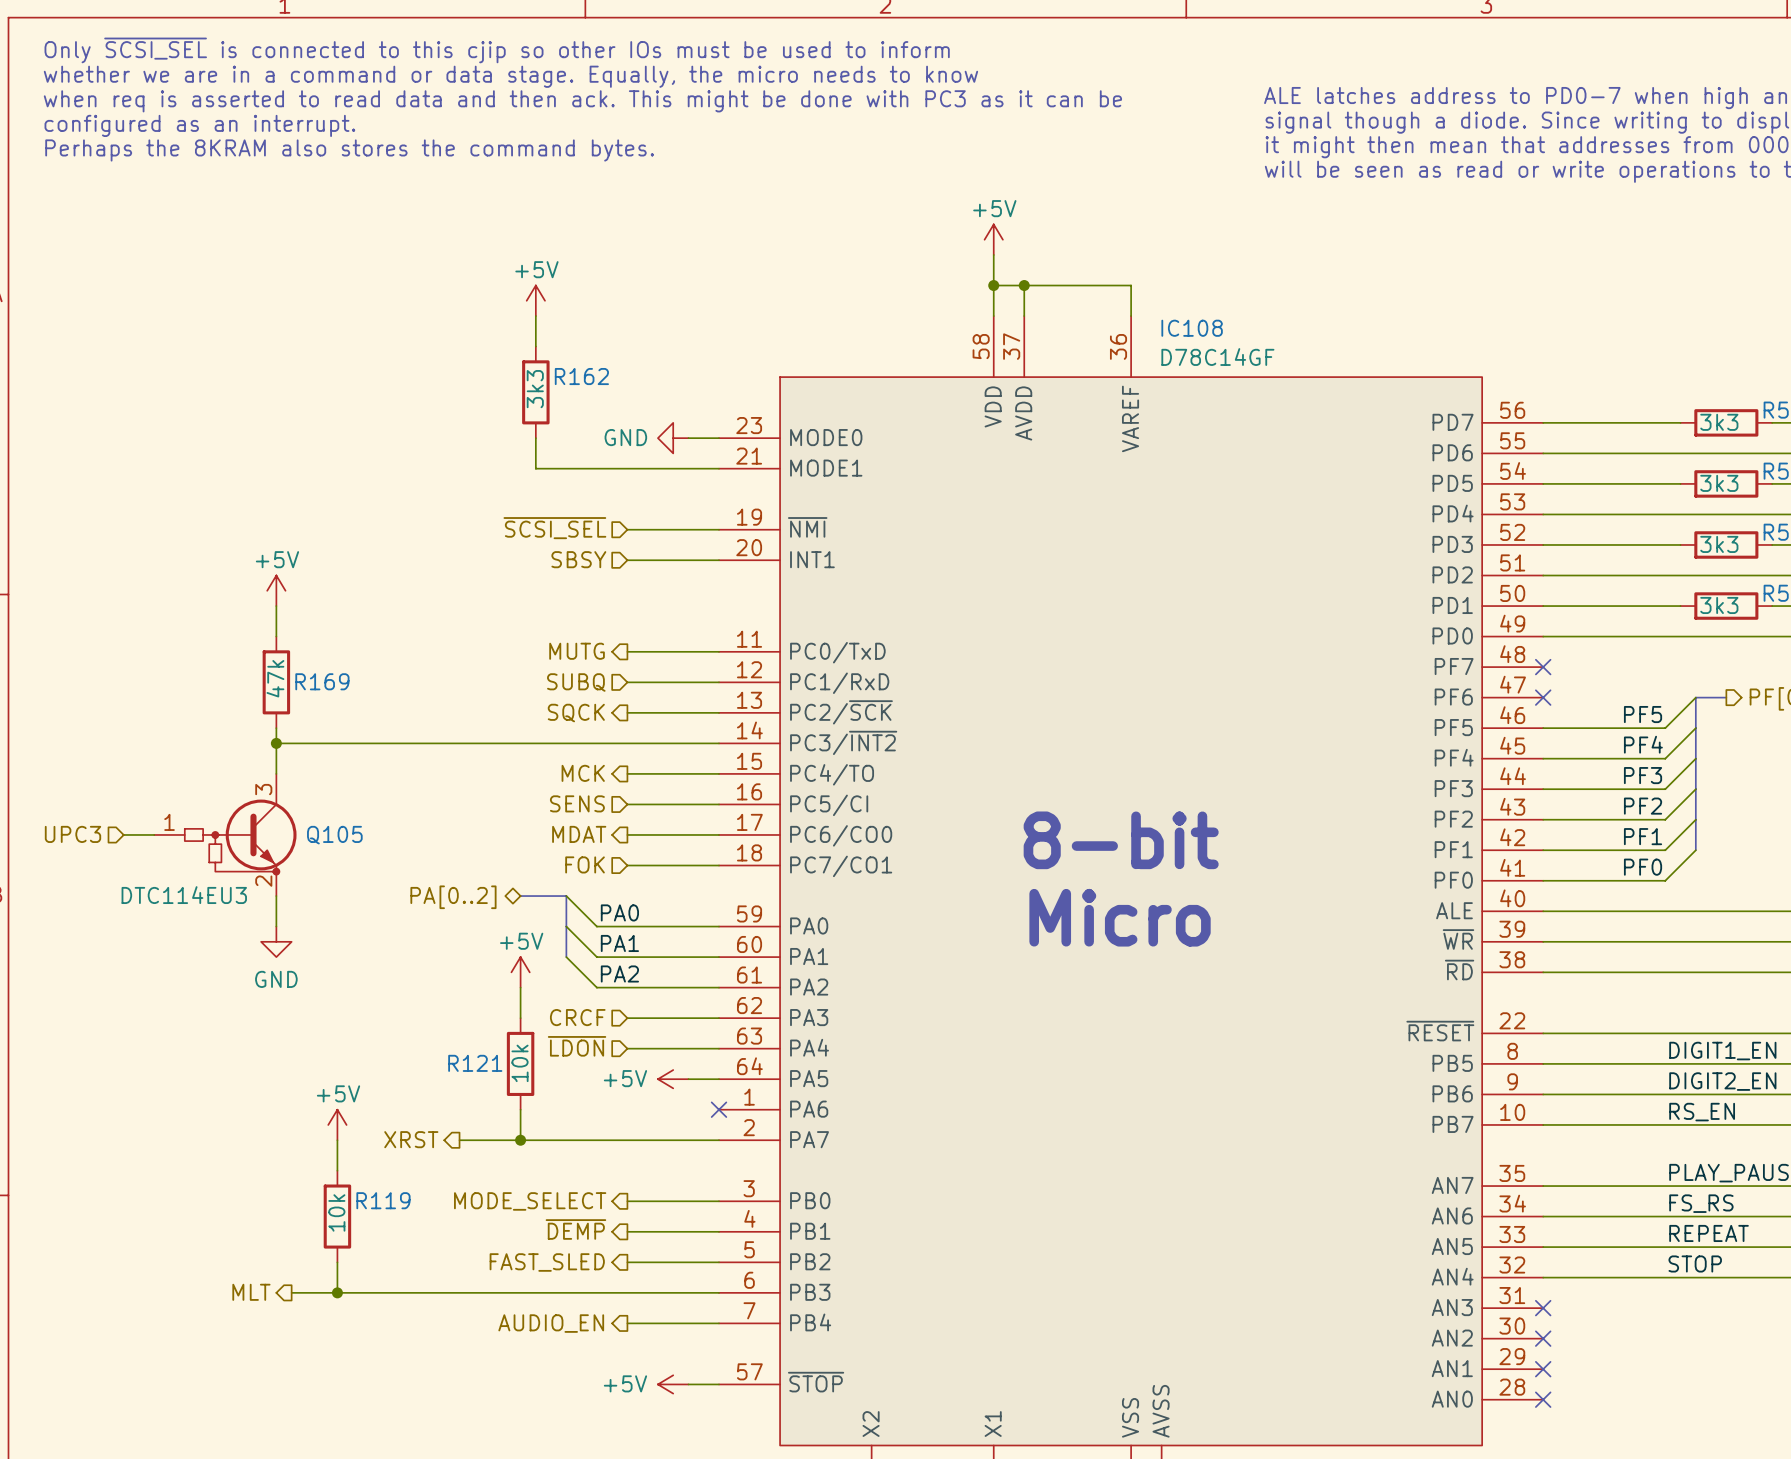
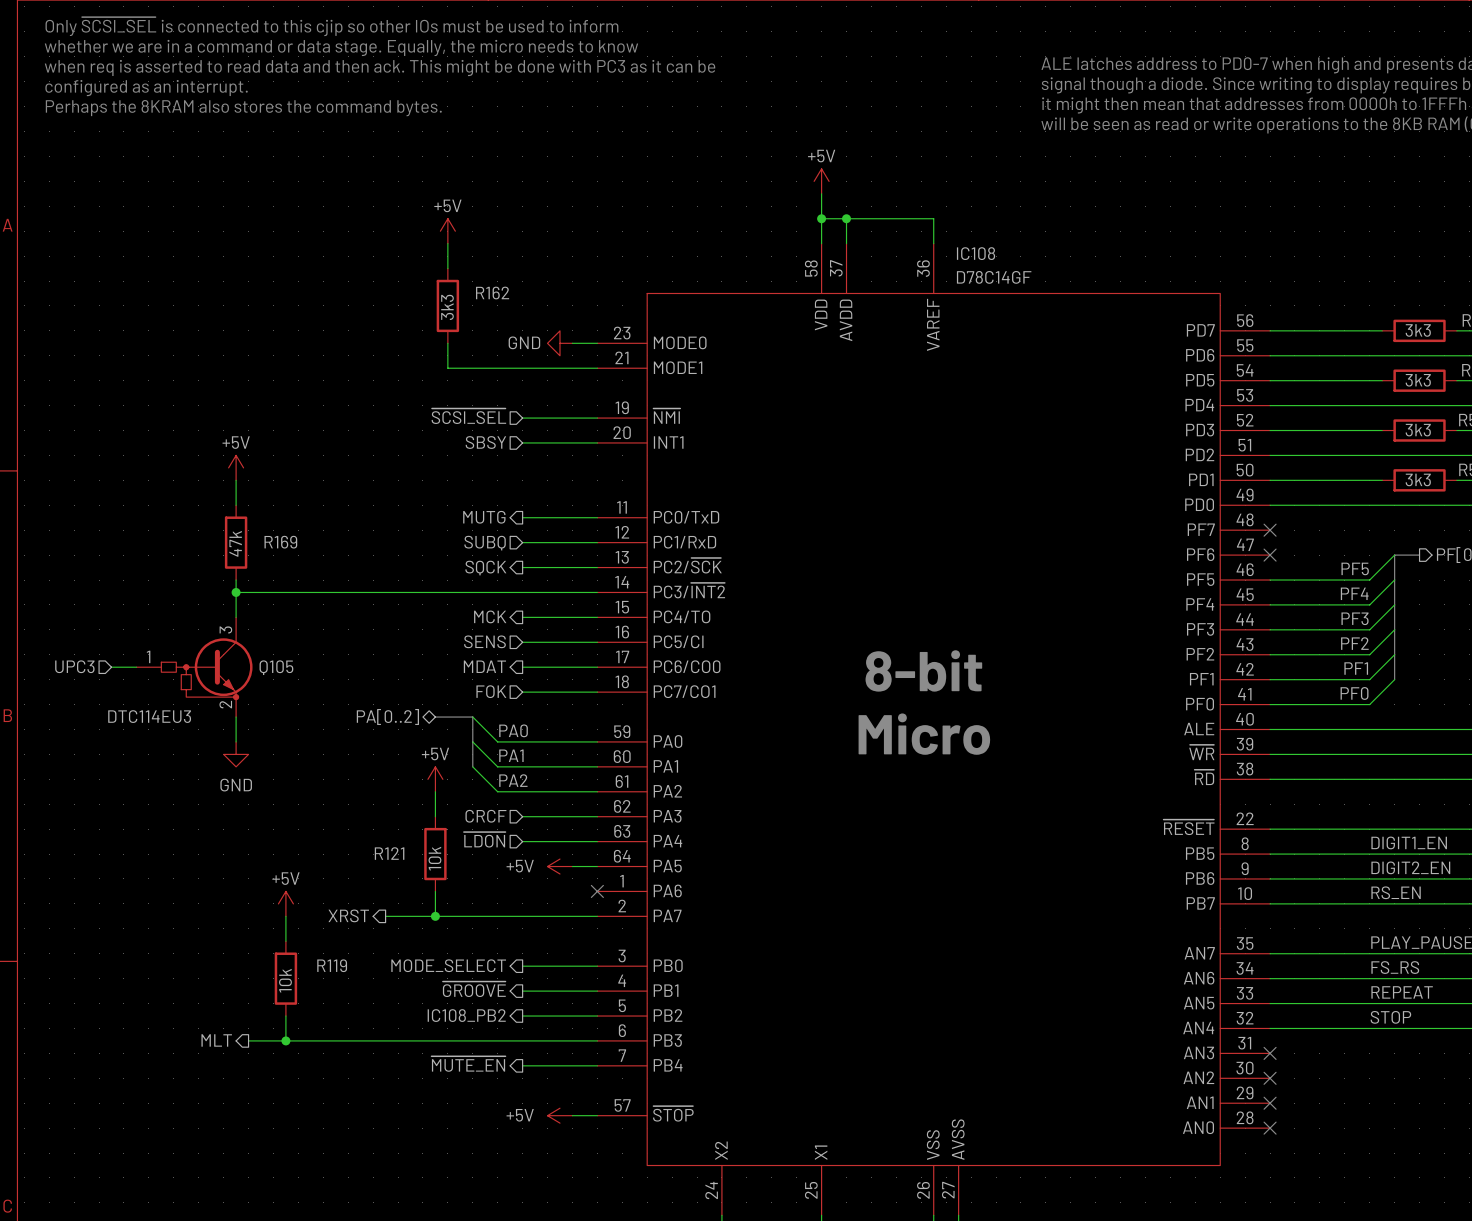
hierarchical label: ~{DEMP} (575, 1229) -> ~{GROOVE} (474, 989)
hierarchical label: FAST_SLED (547, 1262) -> IC108_PB2 (466, 1015)
hierarchical label: AUDIO_EN (551, 1323) -> ~{MUTE_EN} (468, 1064)

